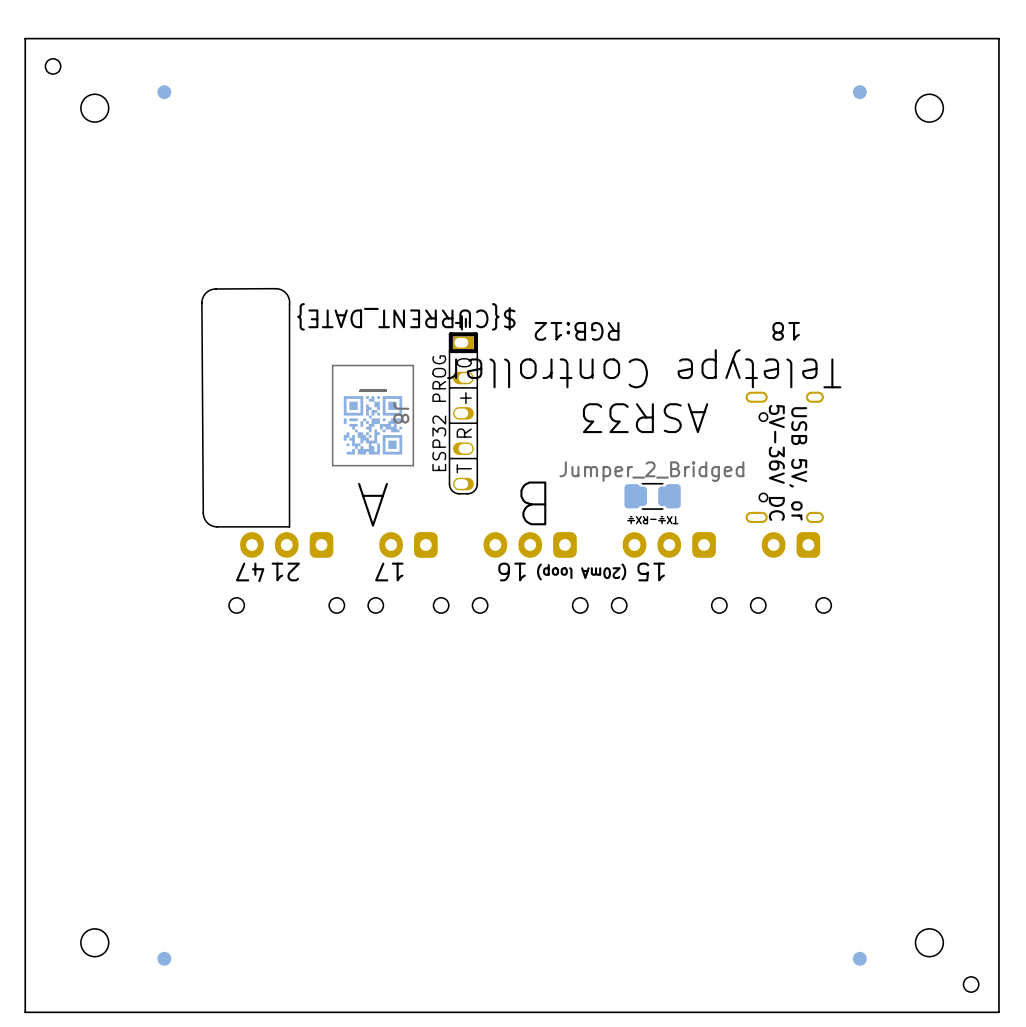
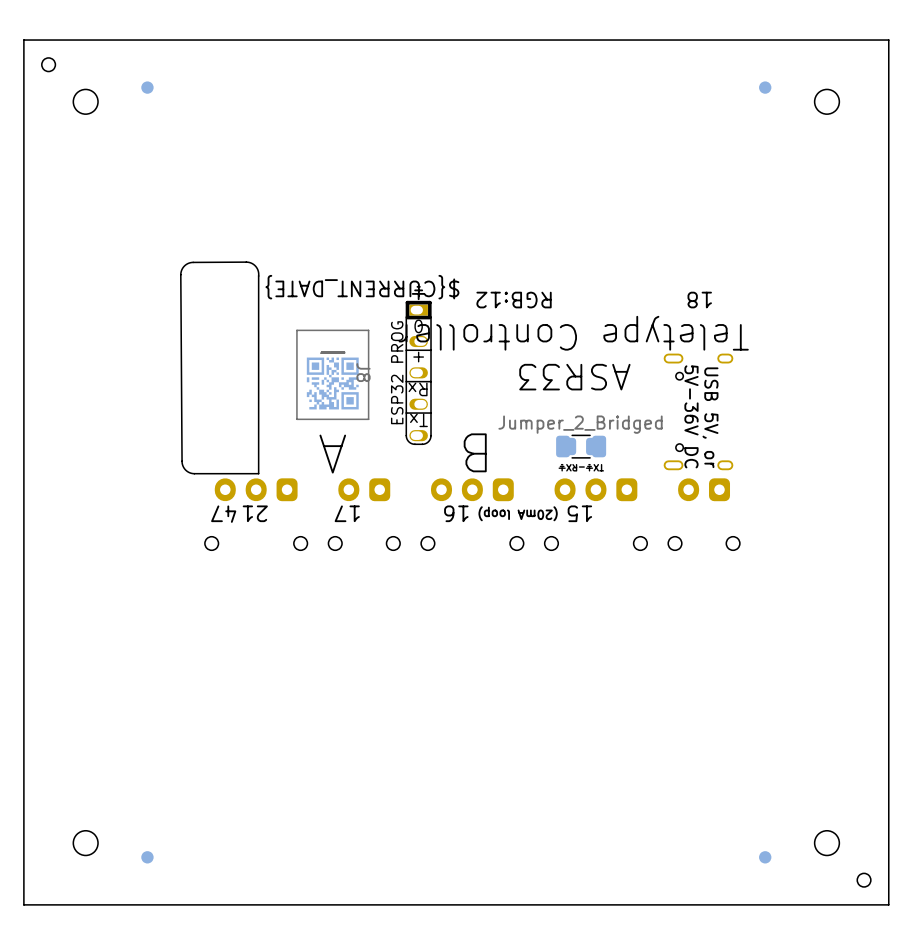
J8 footprint: [448, 332, 479, 495] -> [405, 300, 432, 445]

